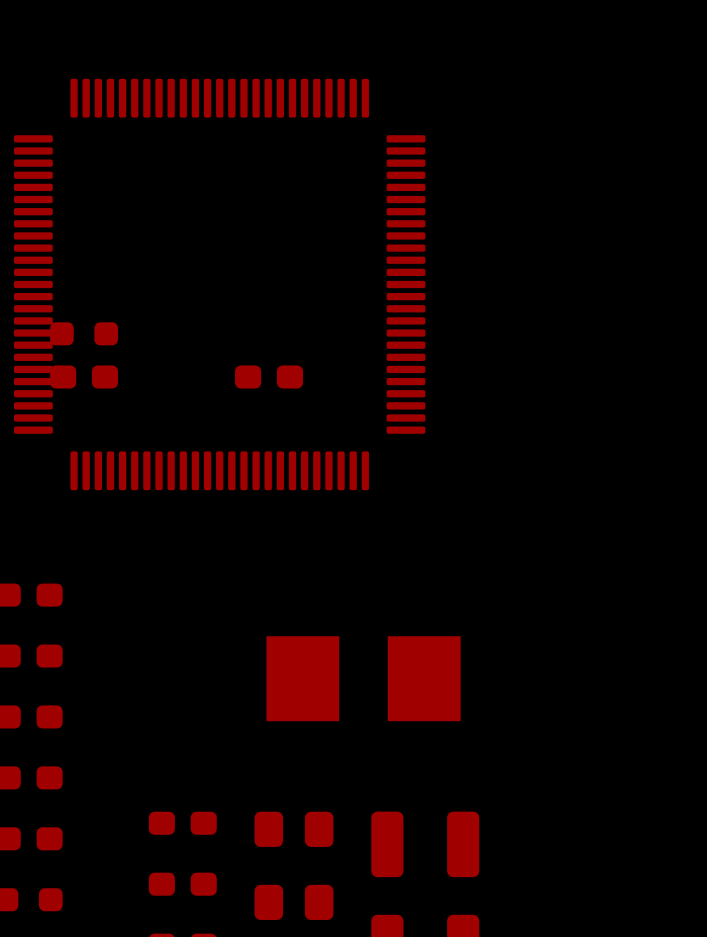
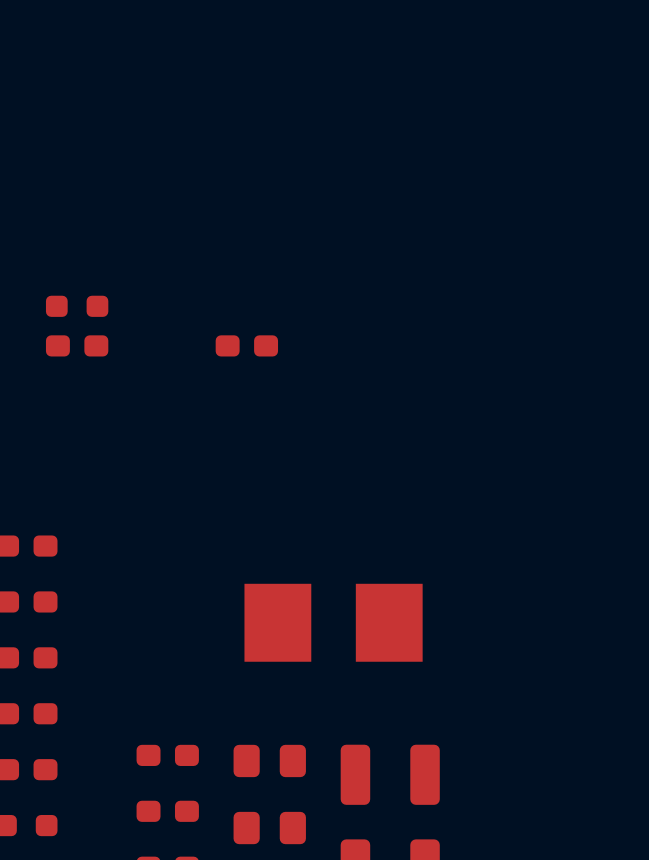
part: (219, 284) -> none

